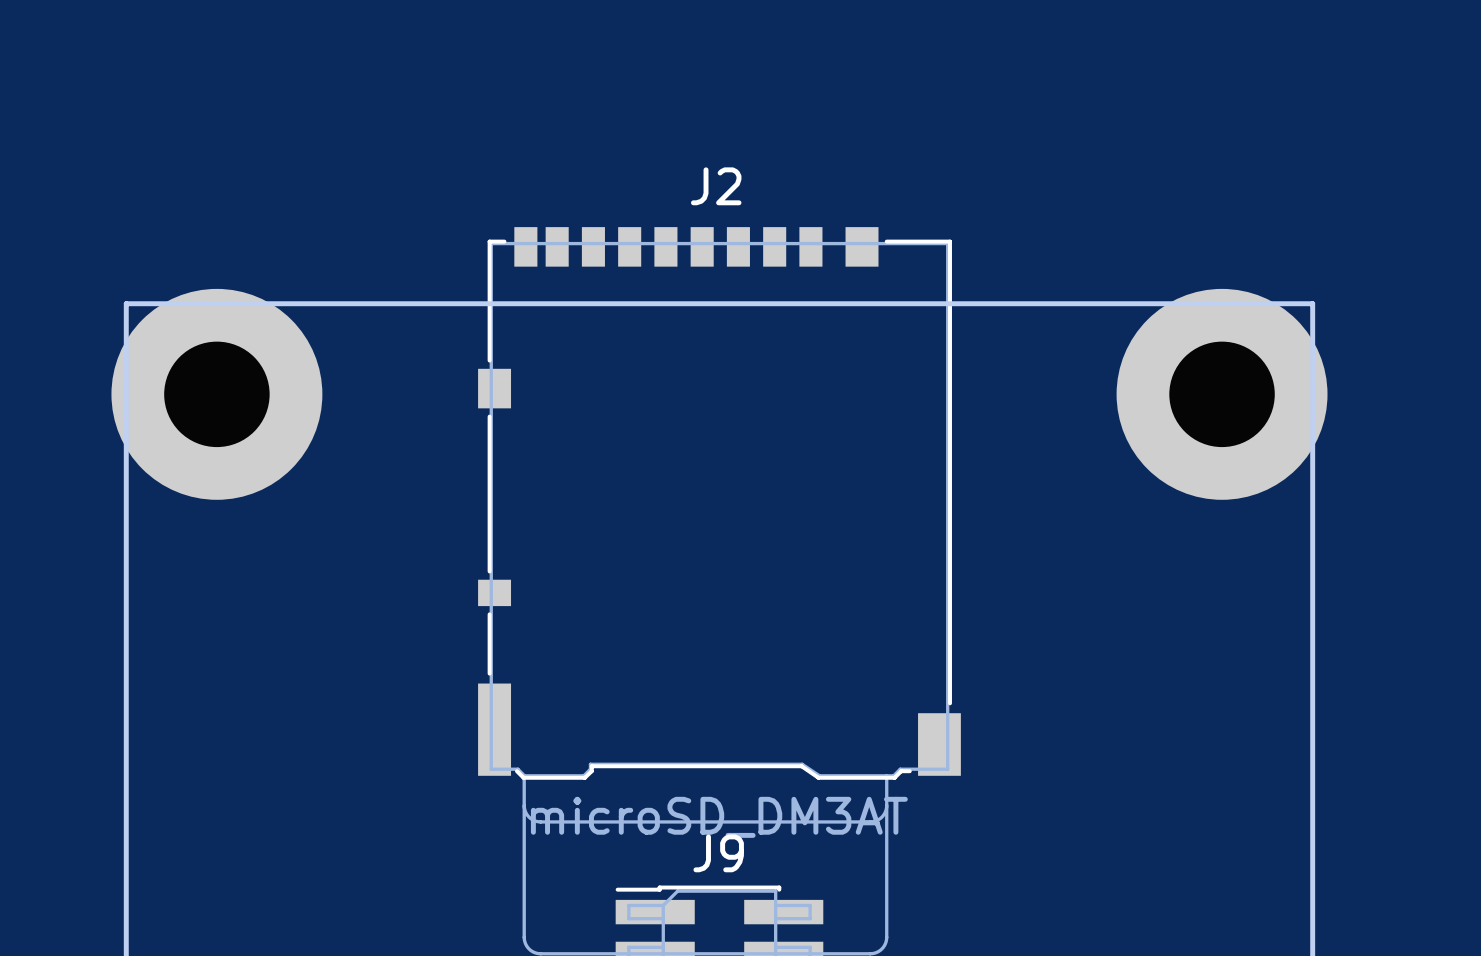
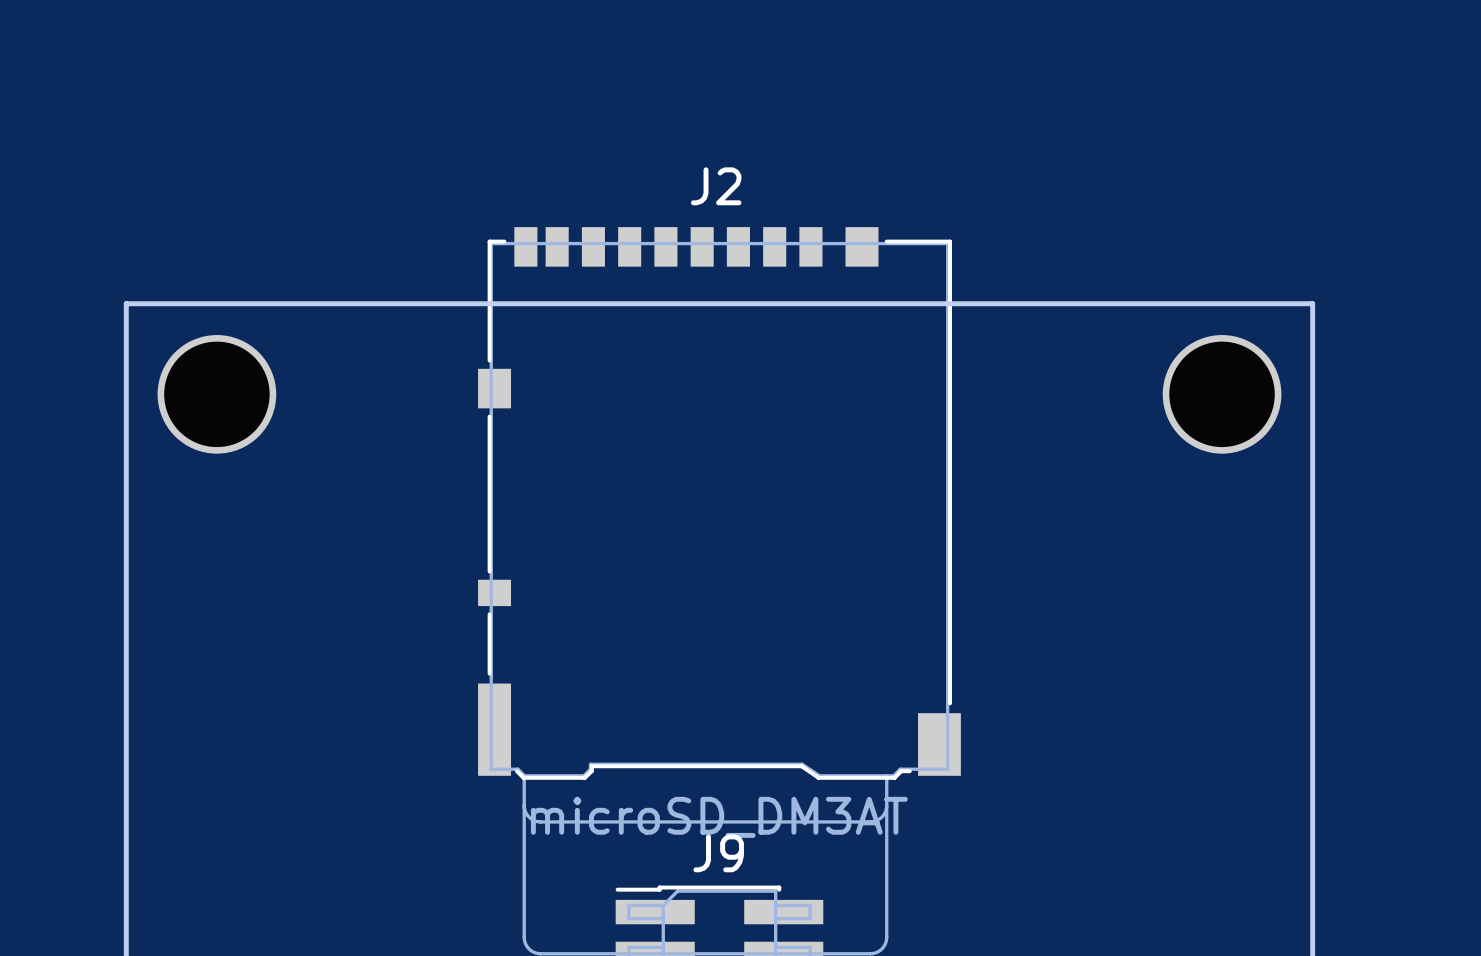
part footprint: [111, 288, 323, 500] -> [157, 335, 277, 454]
part footprint: [1116, 288, 1328, 500] -> [1162, 335, 1282, 454]

